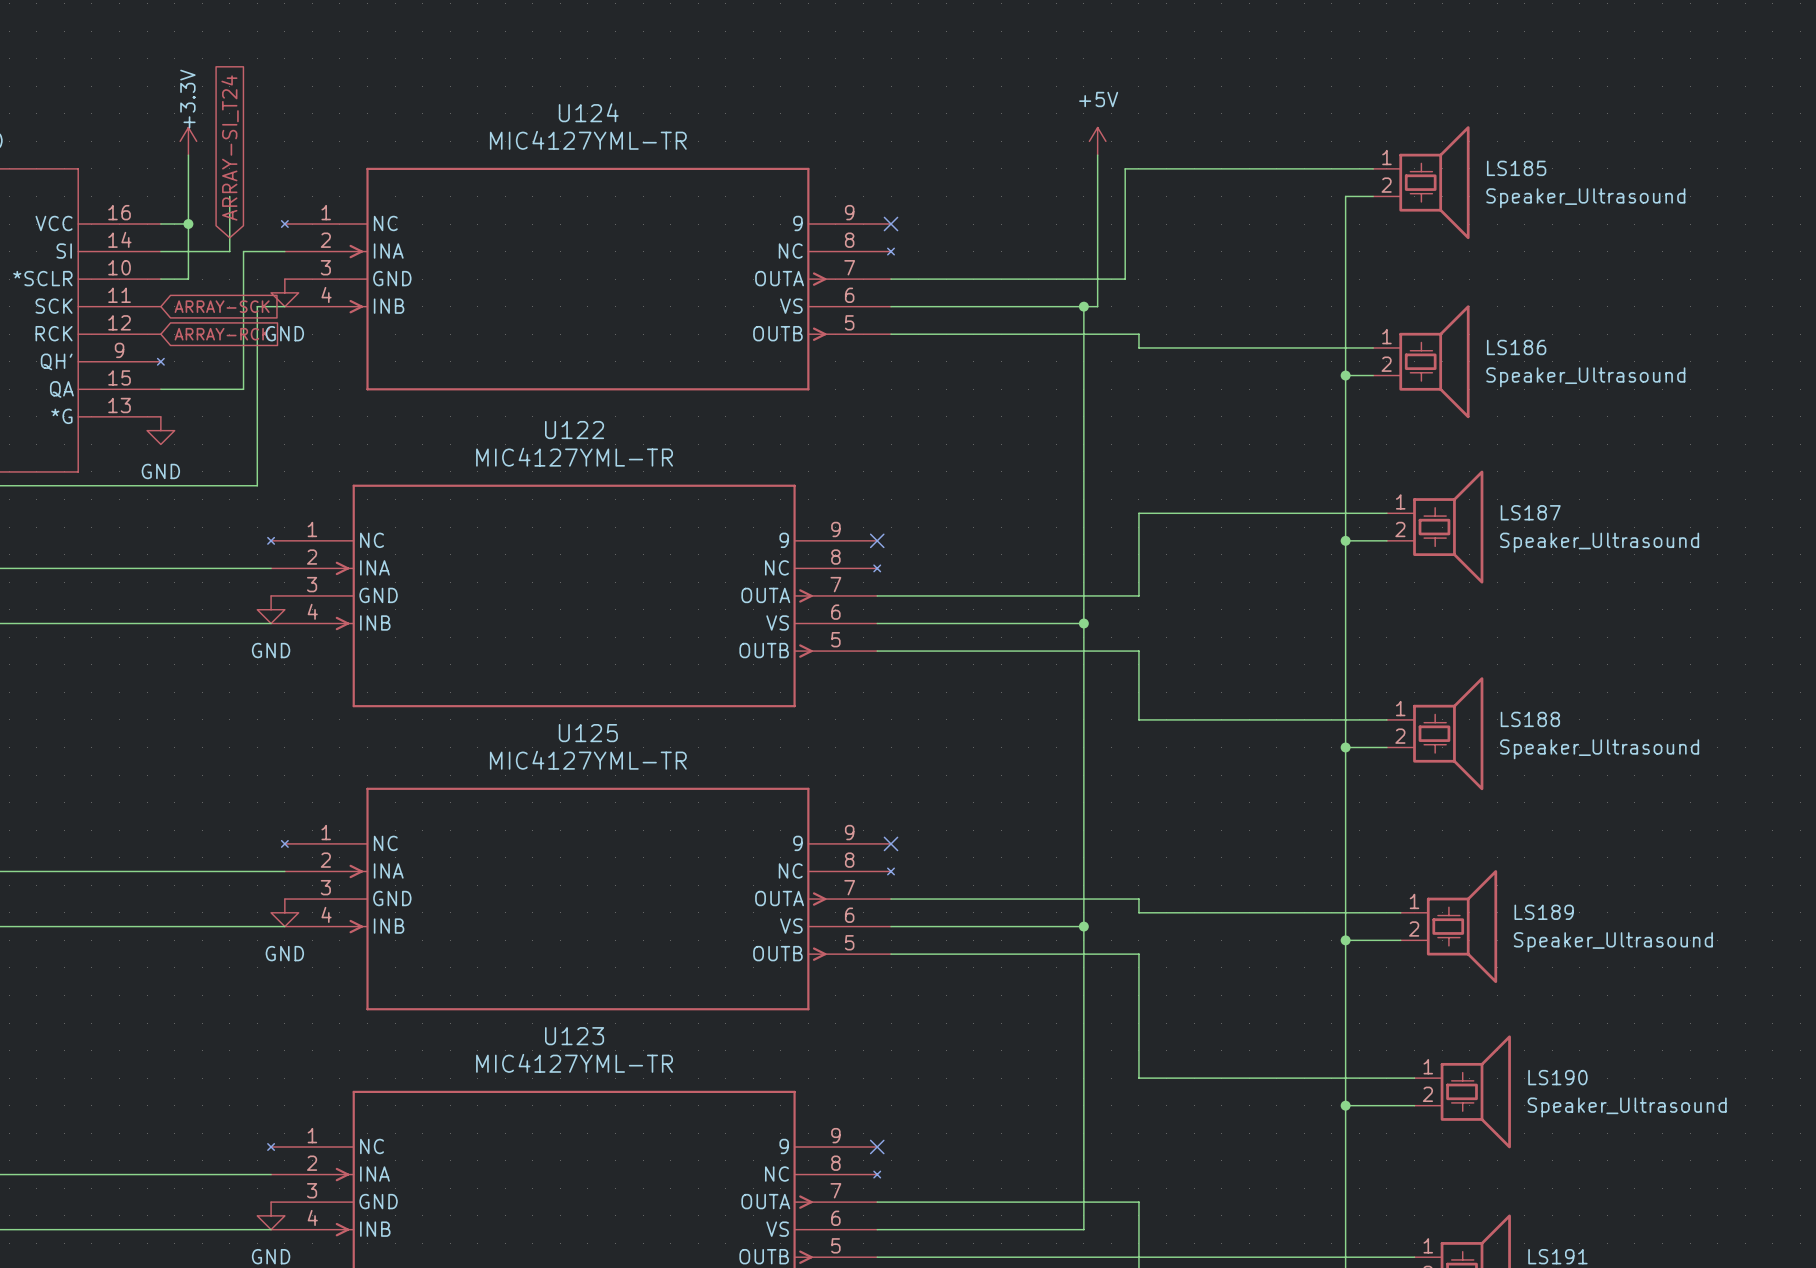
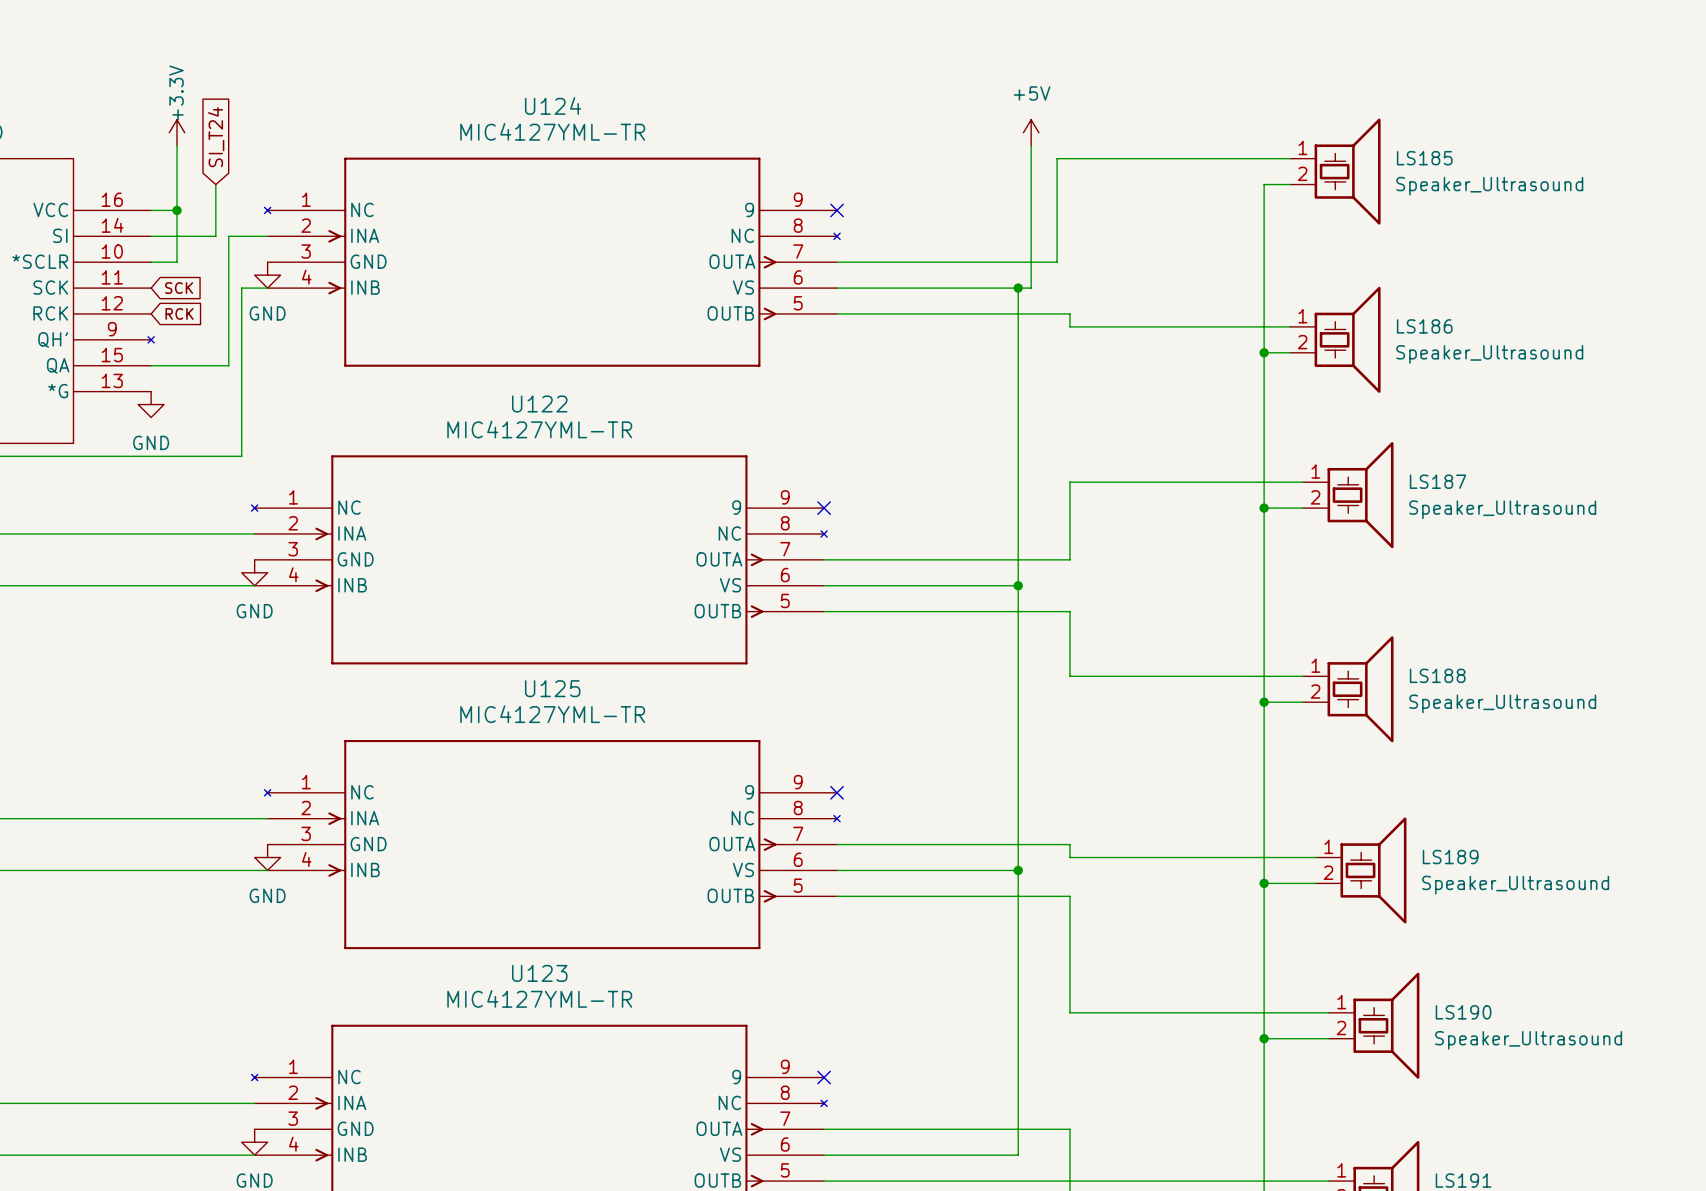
global label: ARRAY-SI_T24 (230, 148) -> SI_T24 (216, 137)
global label: ARRAY-SCK (222, 306) -> SCK (179, 288)
global label: ARRAY-RCK (222, 334) -> RCK (179, 313)

